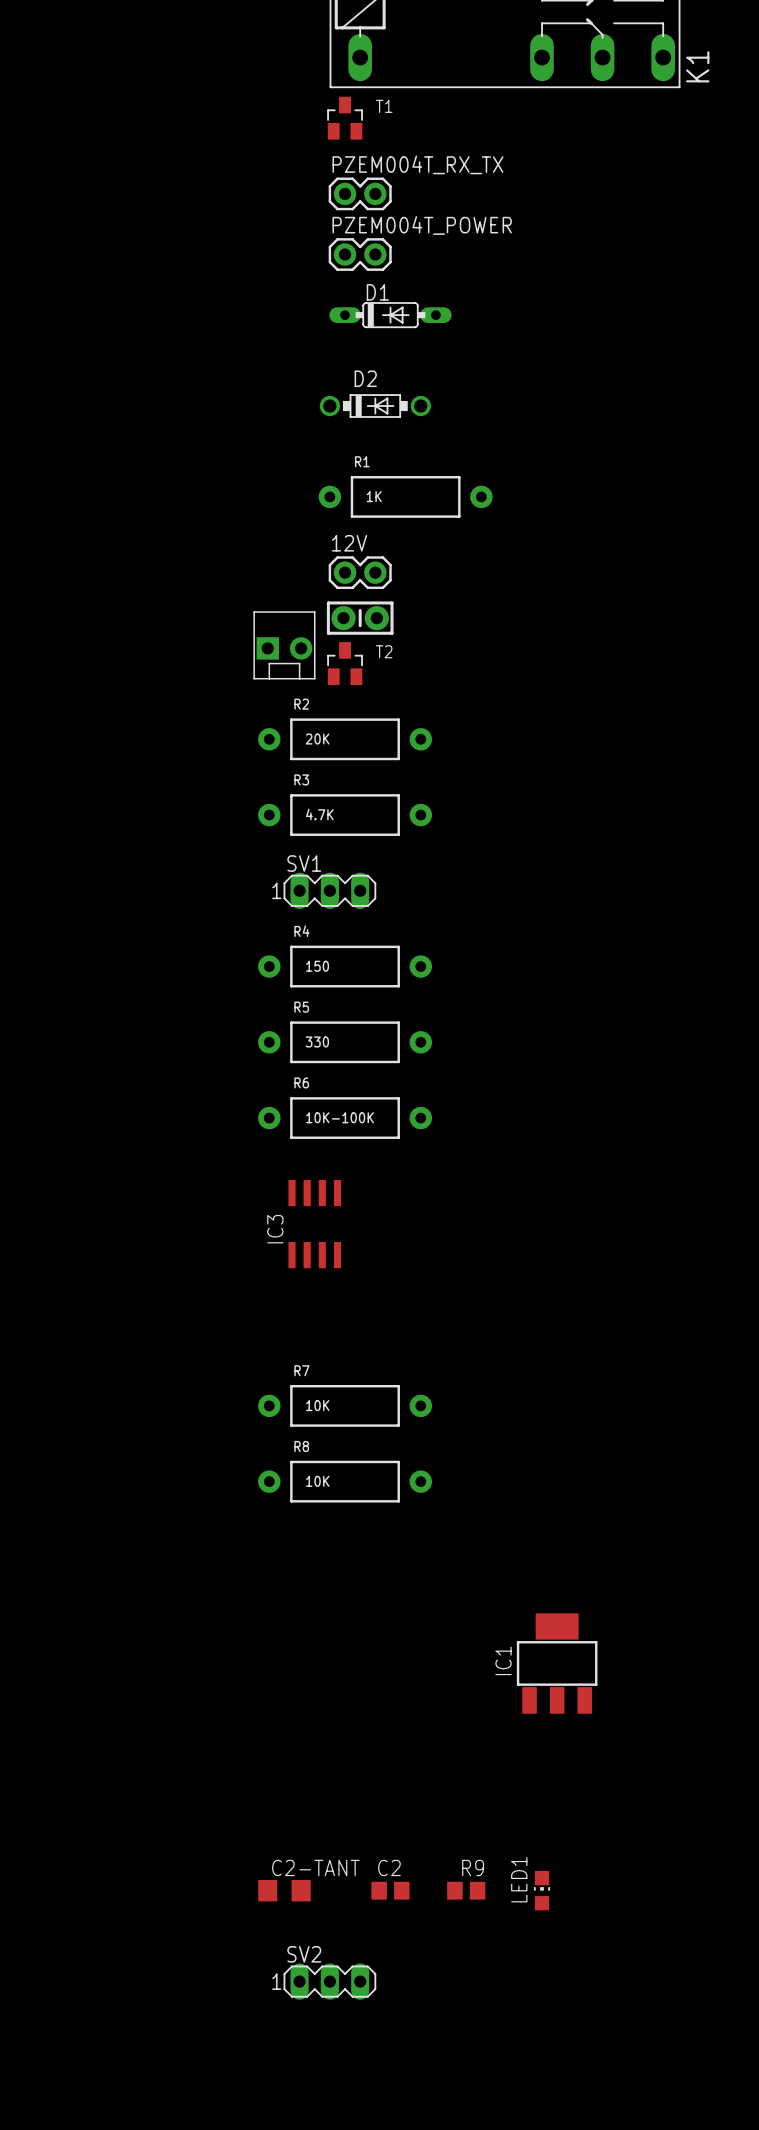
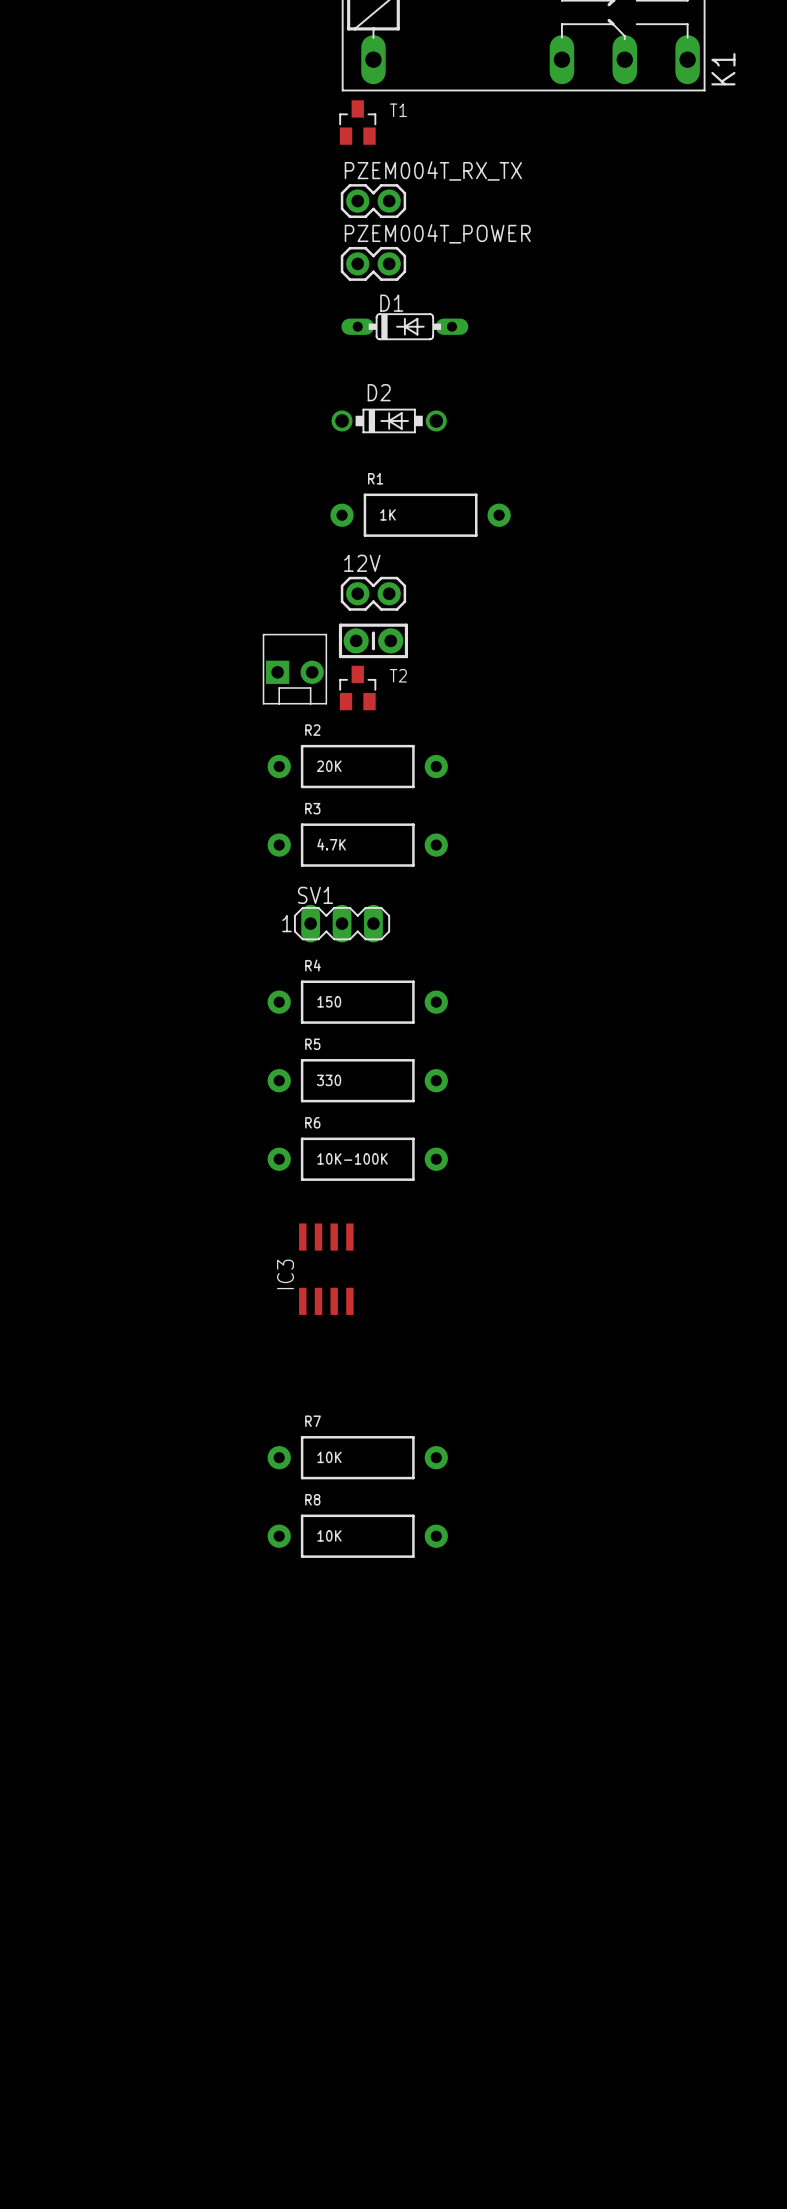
IC1: (557, 1663) -> none
C2-TANT: (284, 1890) -> none
C2: (390, 1890) -> none
R9: (466, 1890) -> none
LED1: (541, 1890) -> none
SV2: (329, 1981) -> none

